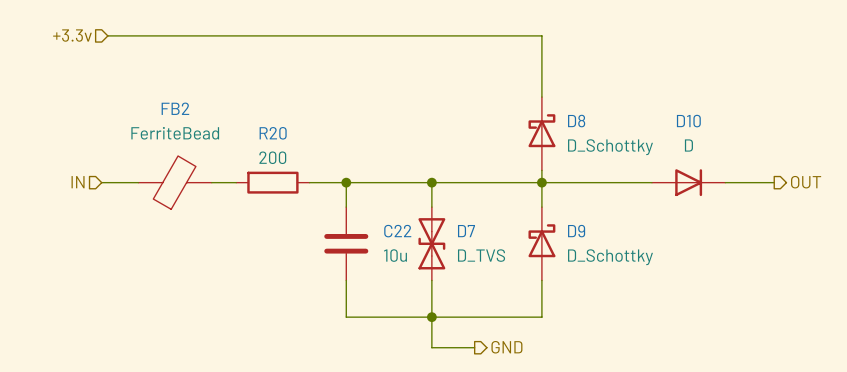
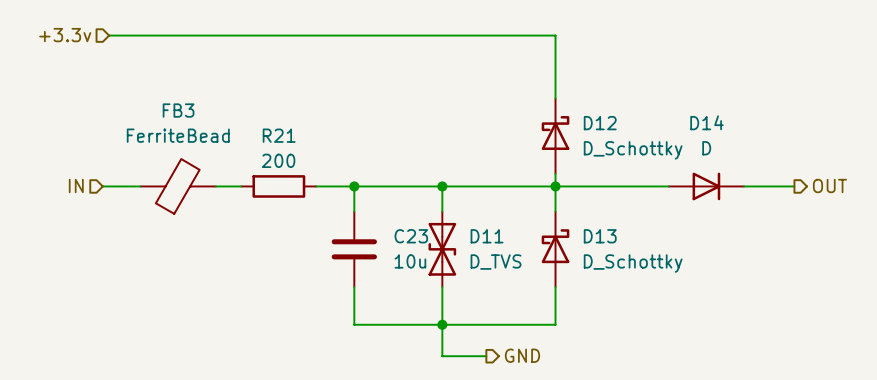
FB2 name: FB2 (175, 108) -> FB3 (178, 110)
D8 name: D8 (576, 121) -> D12 (600, 123)
D10 name: D10 (688, 121) -> D14 (707, 122)
R20 name: R20 (273, 133) -> R21 (279, 135)
C22 name: C22 (397, 231) -> C23 (411, 236)
D7 name: D7 (466, 231) -> D11 (487, 236)
D9 name: D9 (576, 231) -> D13 (600, 236)

